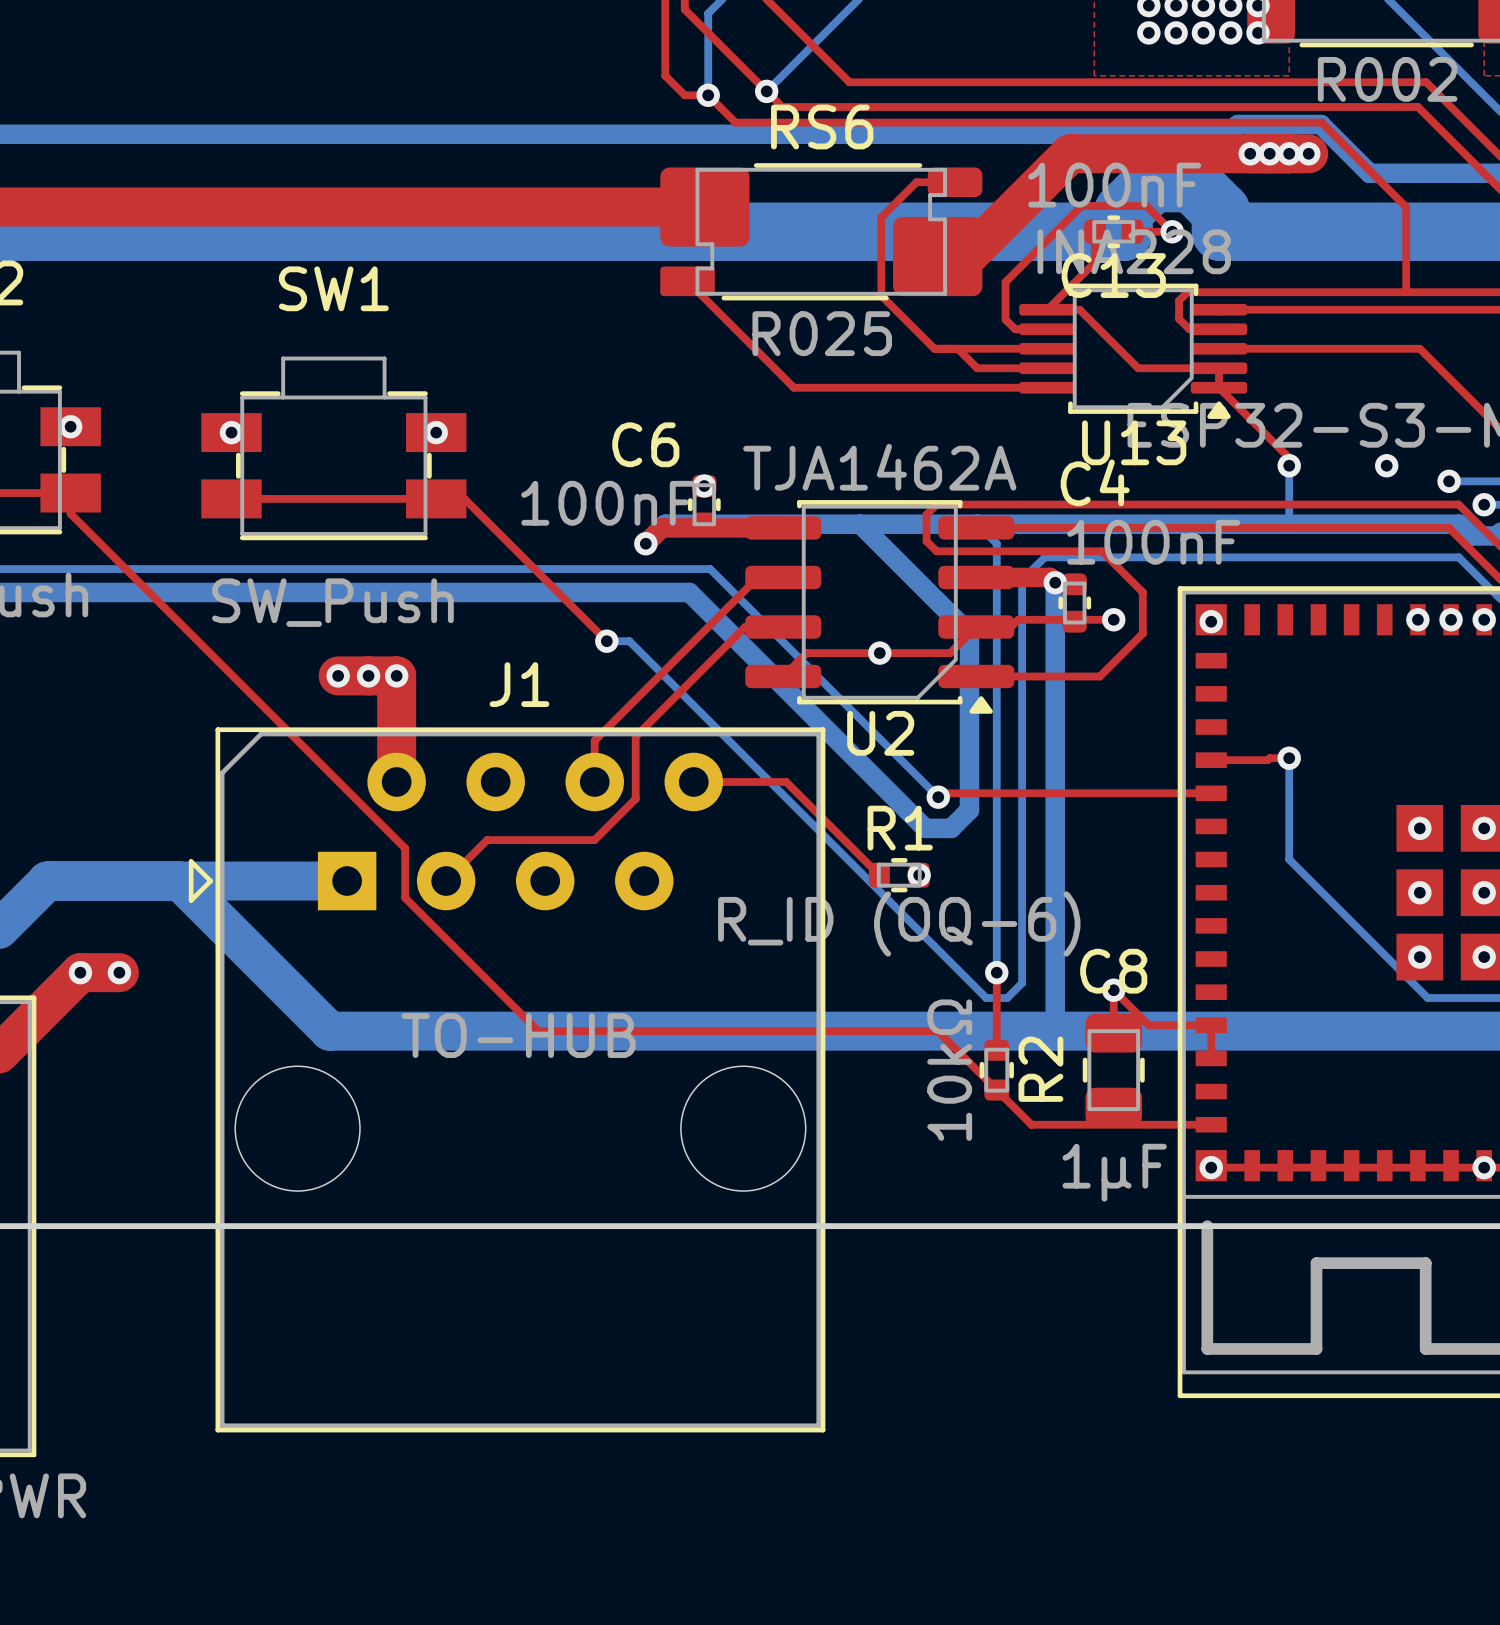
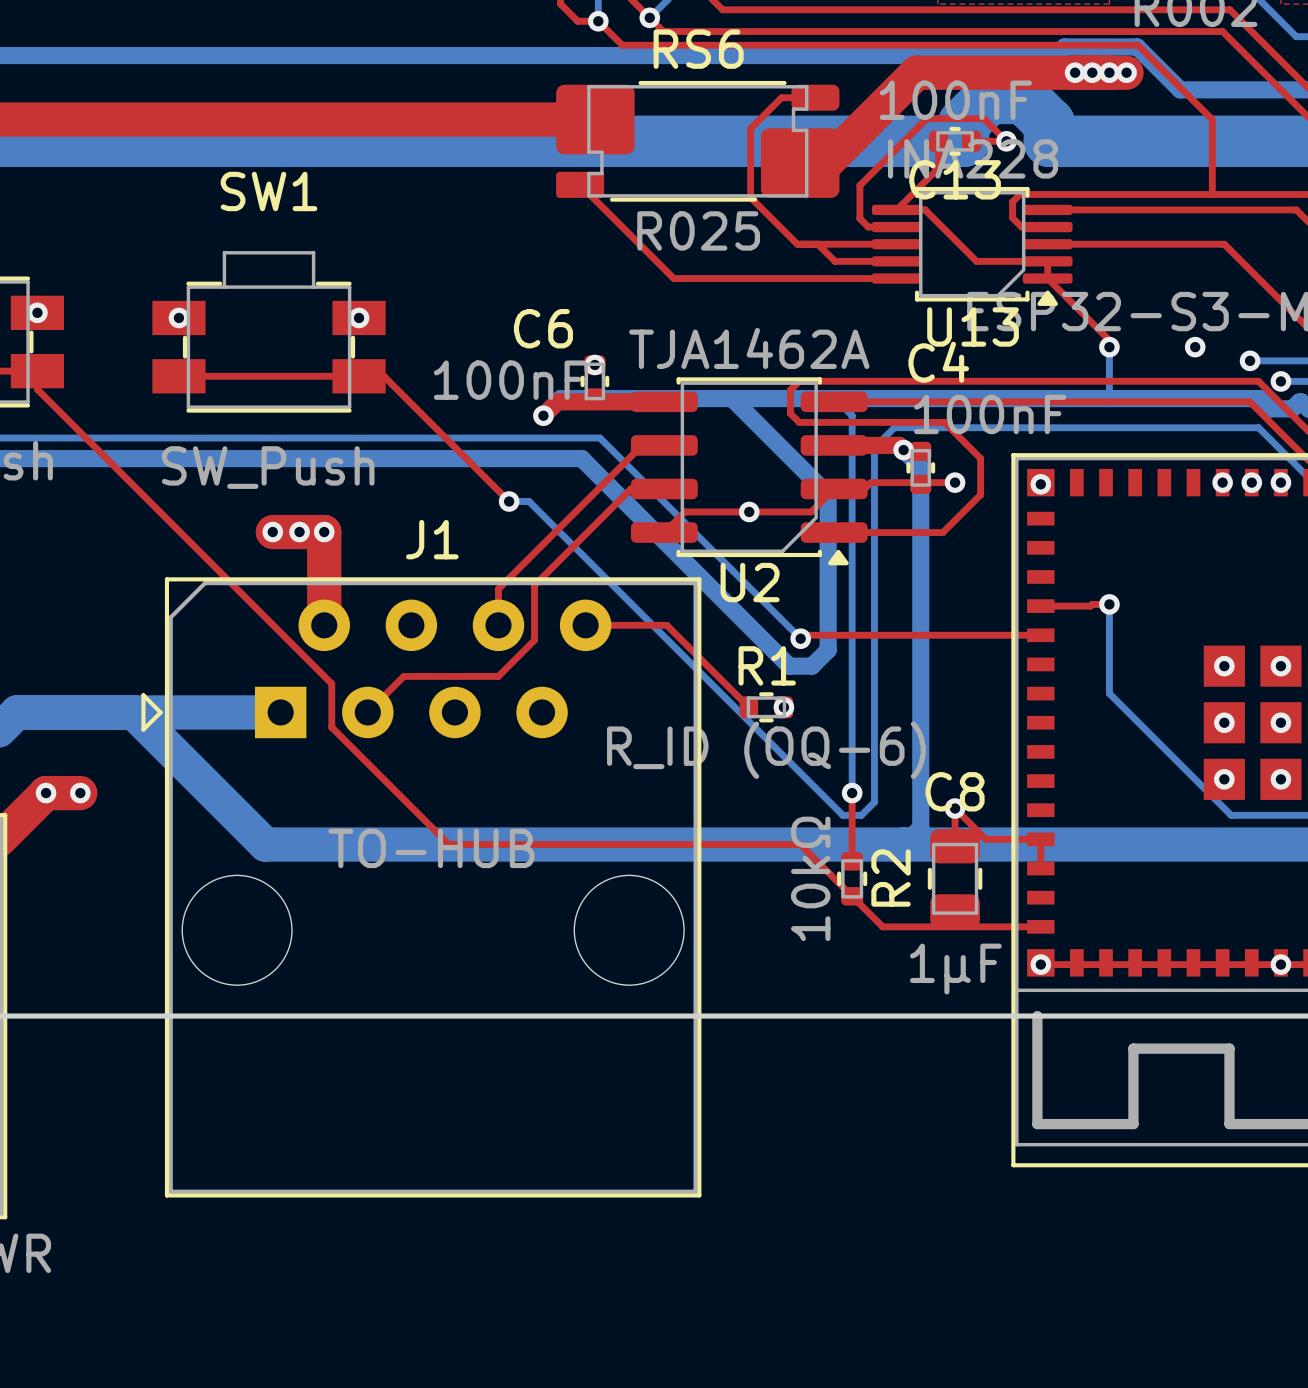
bottom track: (1055, 582) (1055, 1031) -> (903, 450) (920, 467) (920, 827) (903, 844)

